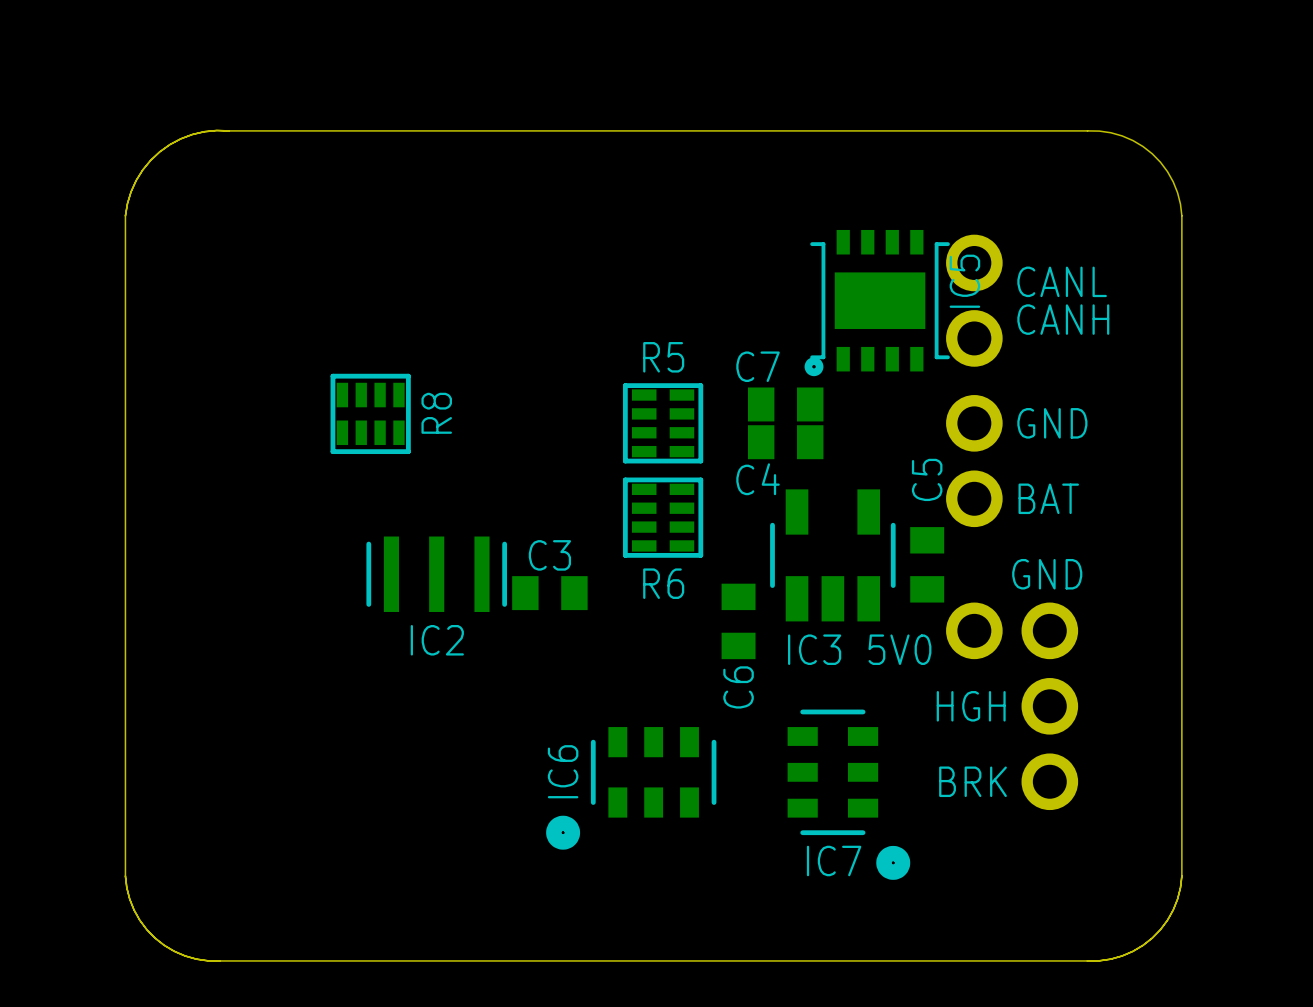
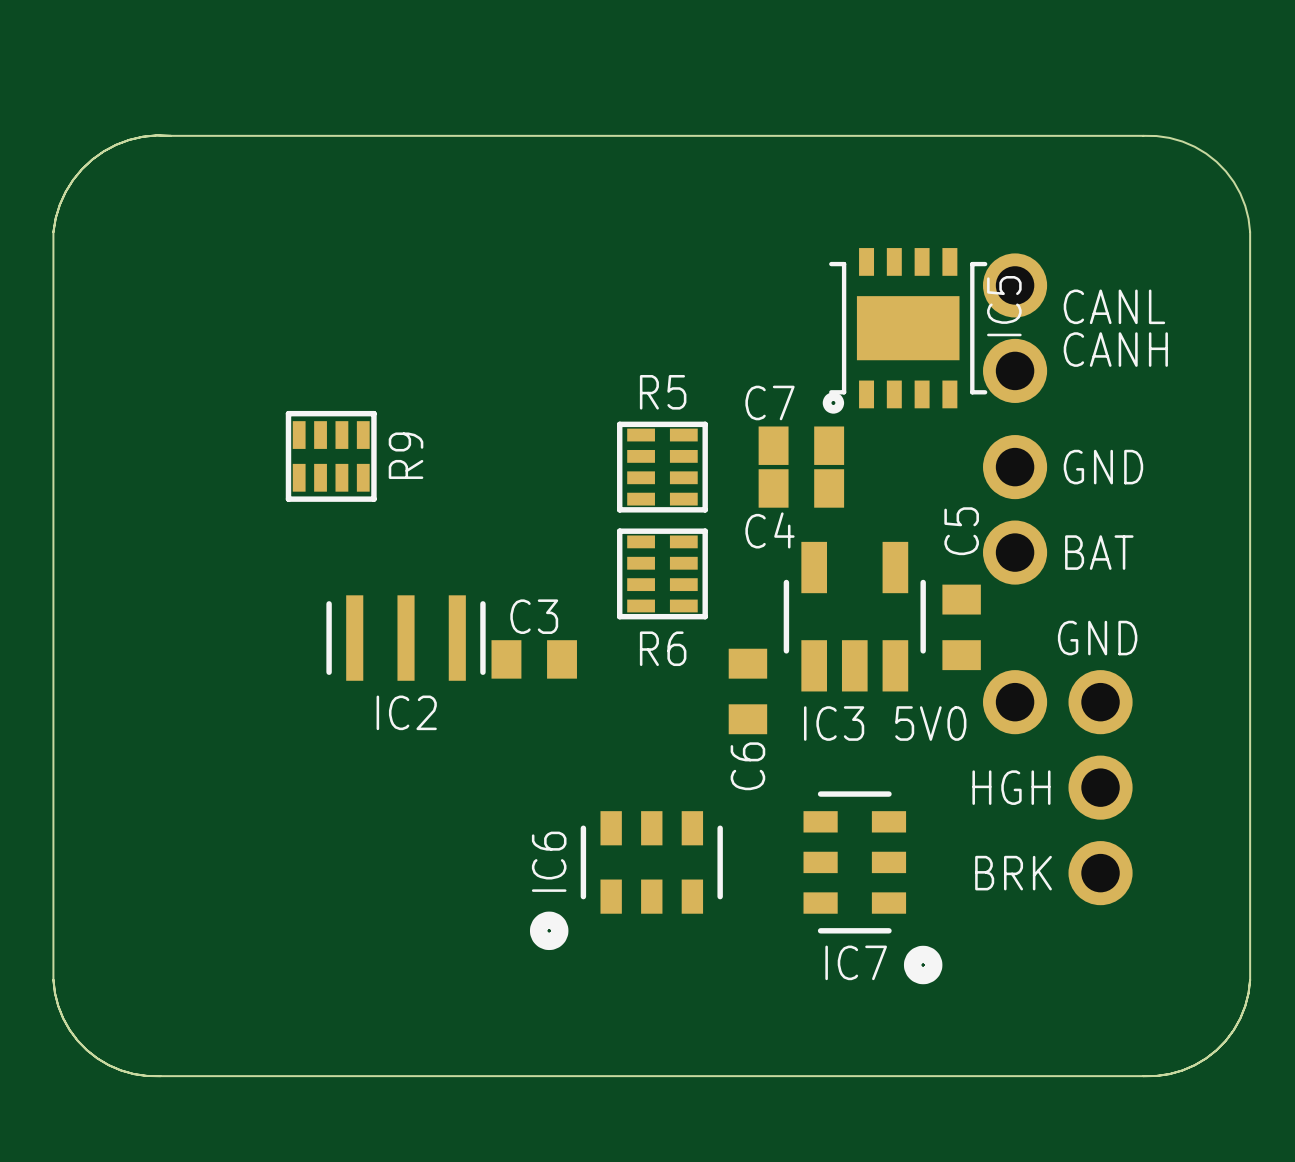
R8 name: R8 (436, 413) -> R9 (406, 455)

